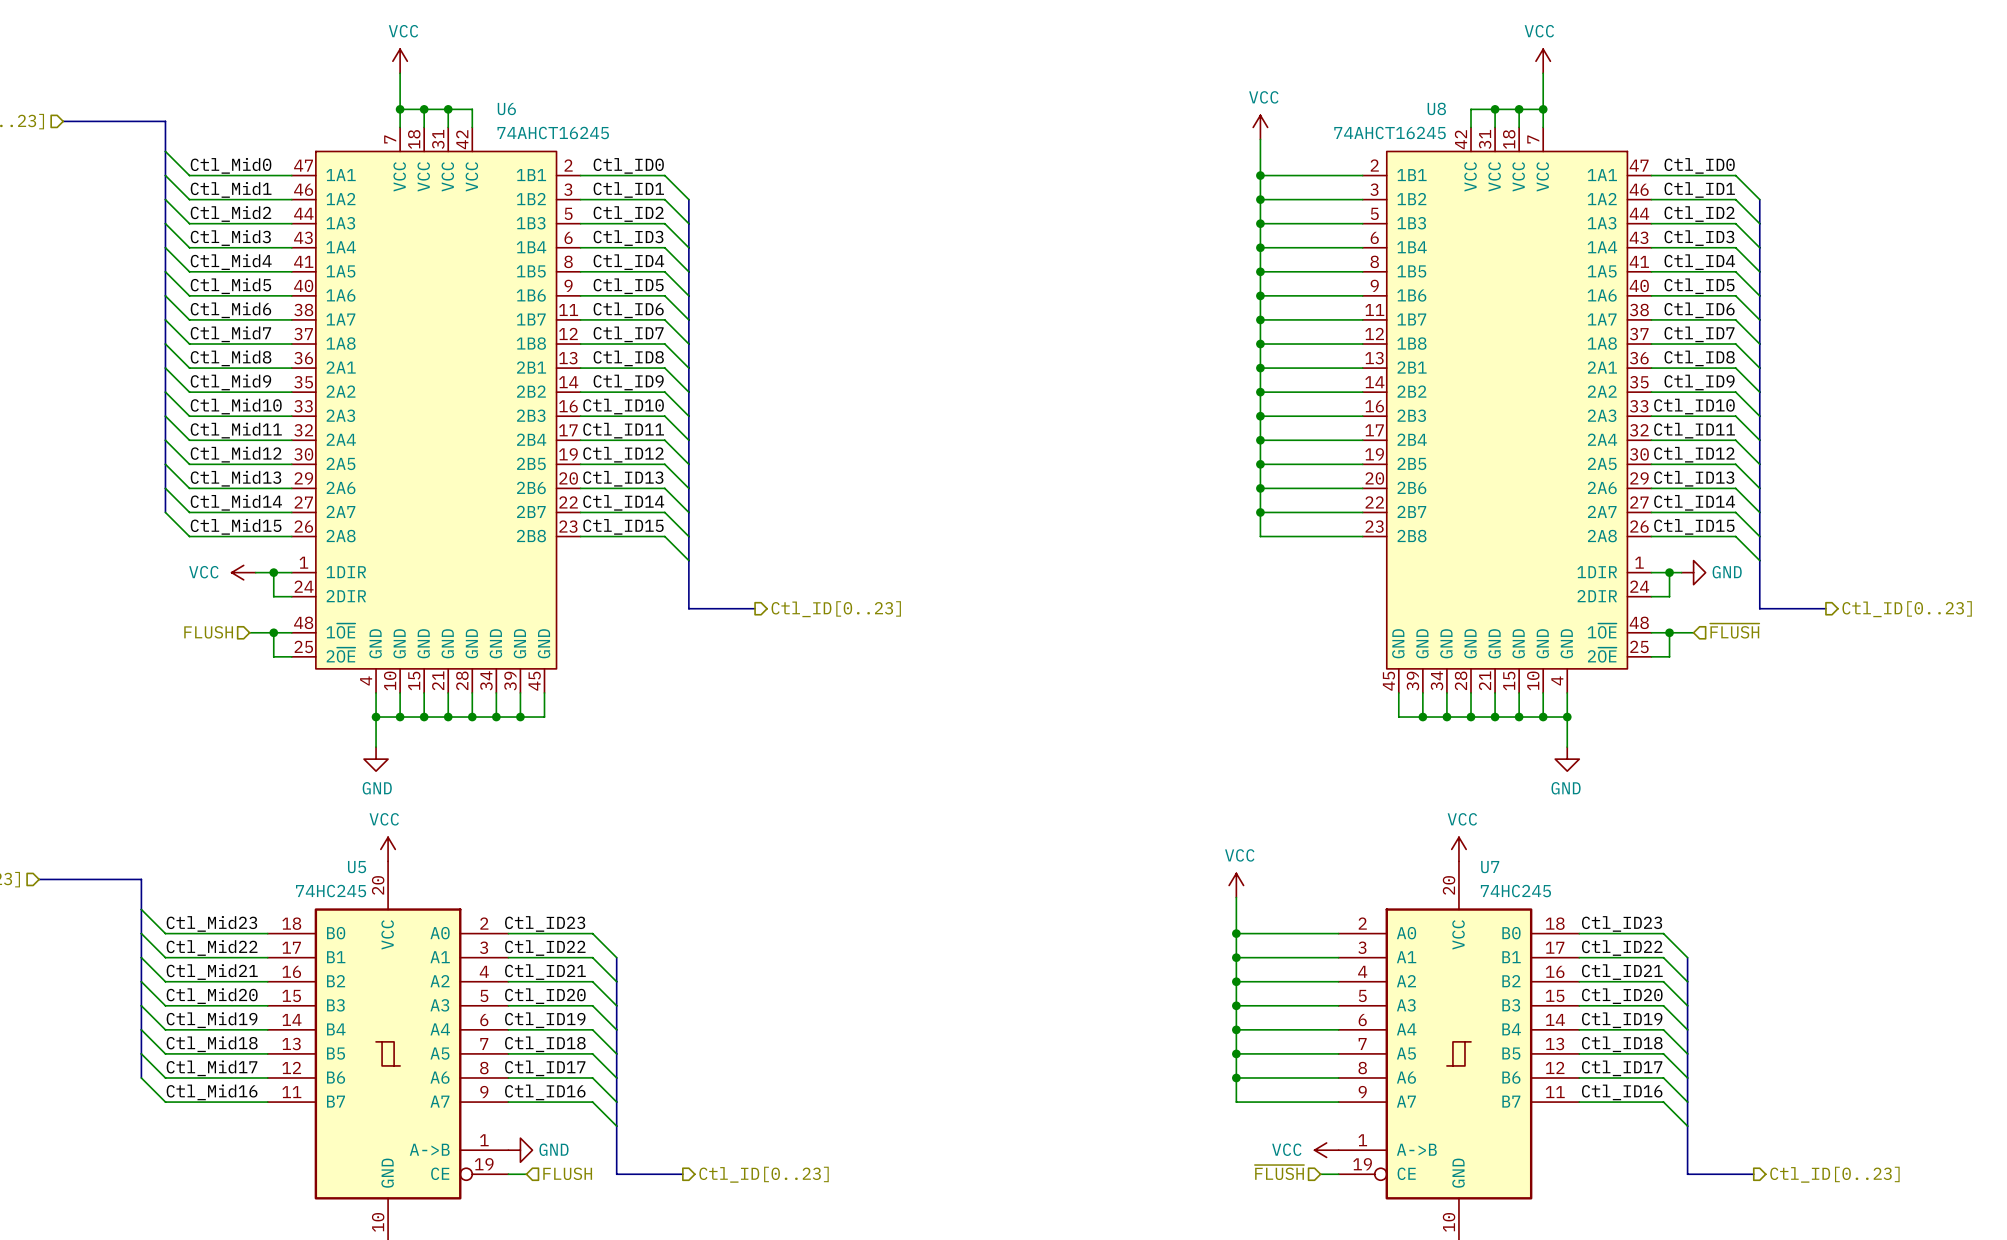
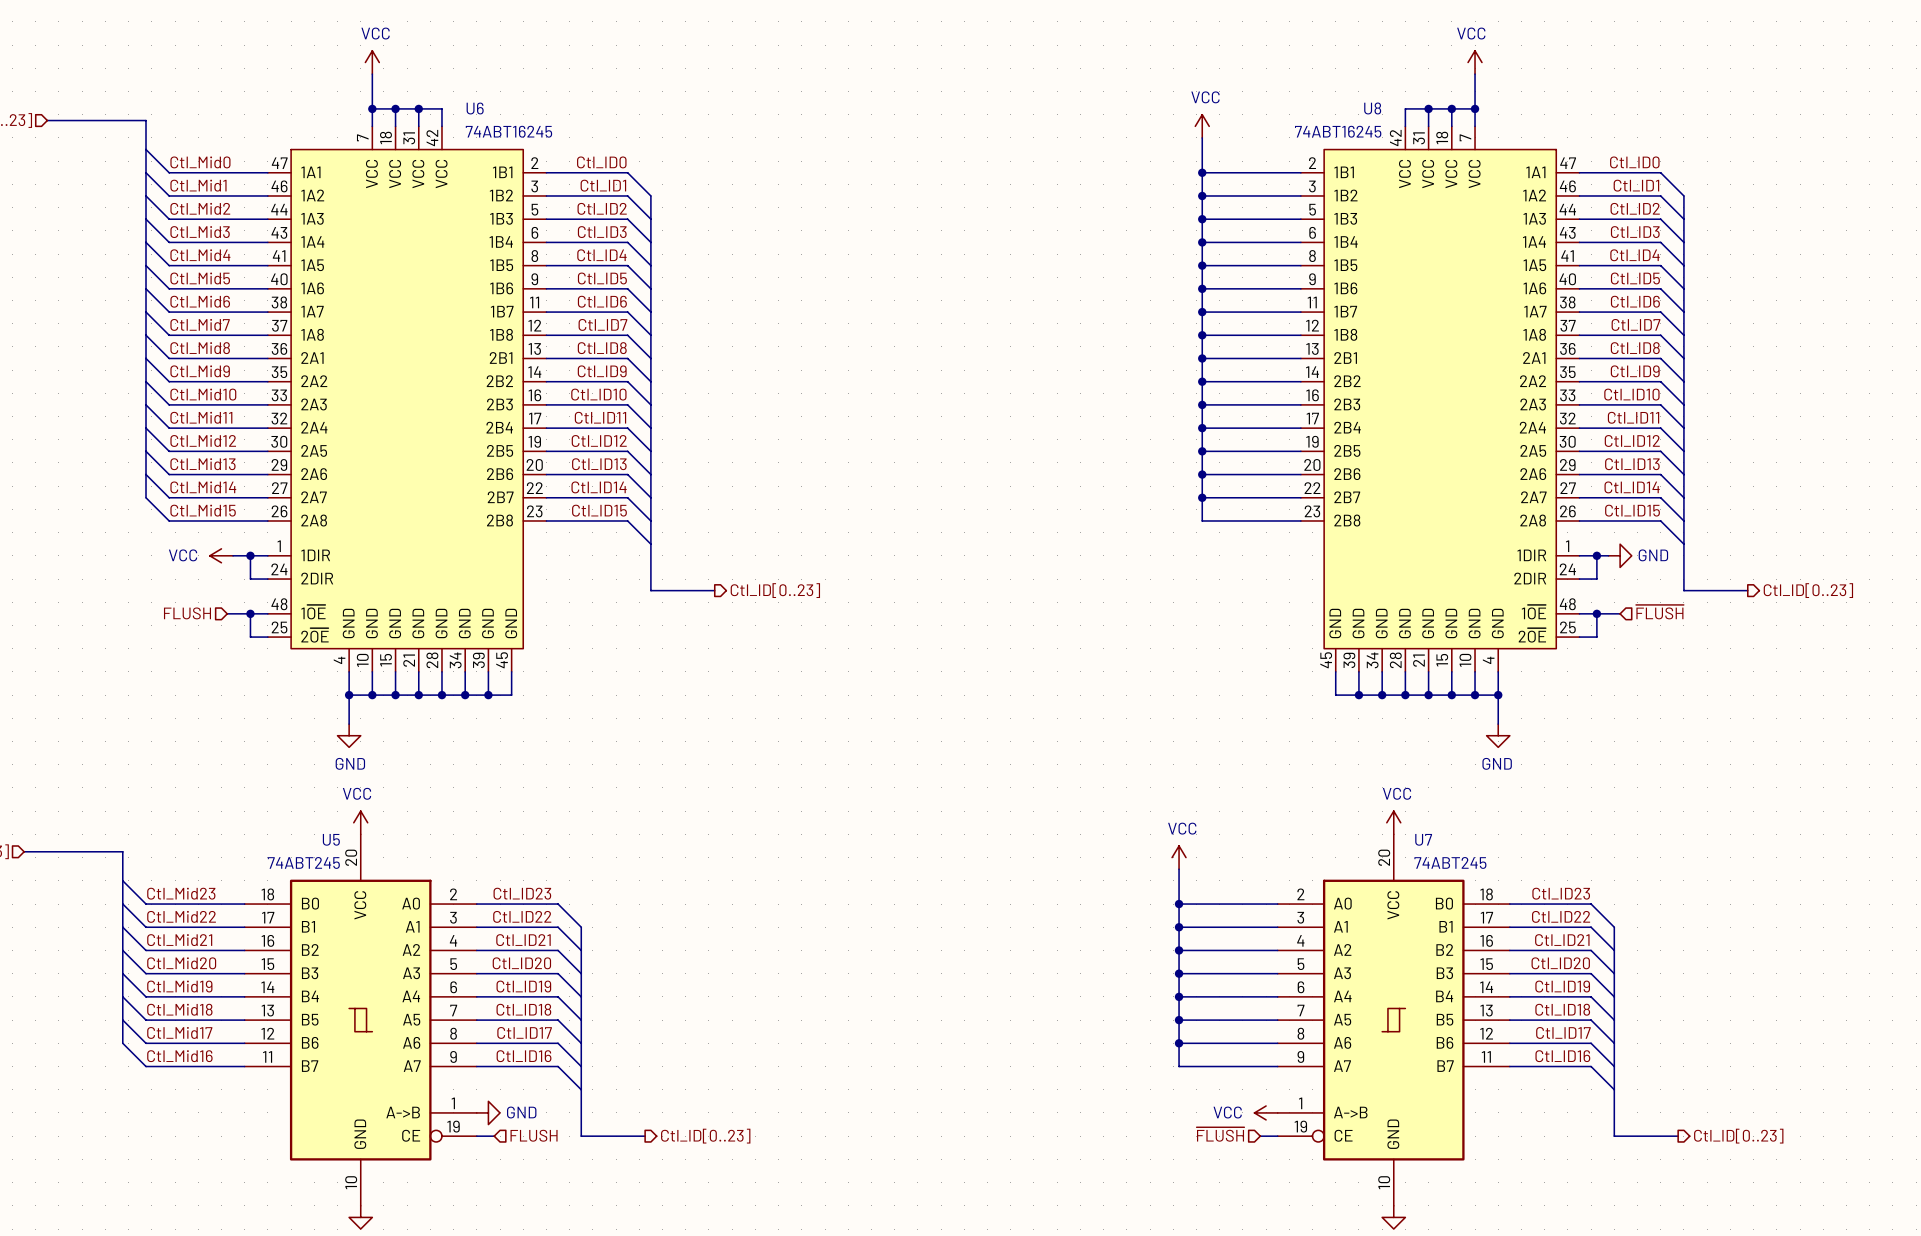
U6 value: 74AHCT16245 (553, 132) -> 74ABT16245 (508, 131)
U8 value: 74AHCT16245 (1390, 132) -> 74ABT16245 (1338, 131)
U5 value: 74HC245 (331, 891) -> 74ABT245 (303, 862)
U7 value: 74HC245 (1515, 891) -> 74ABT245 (1450, 862)

